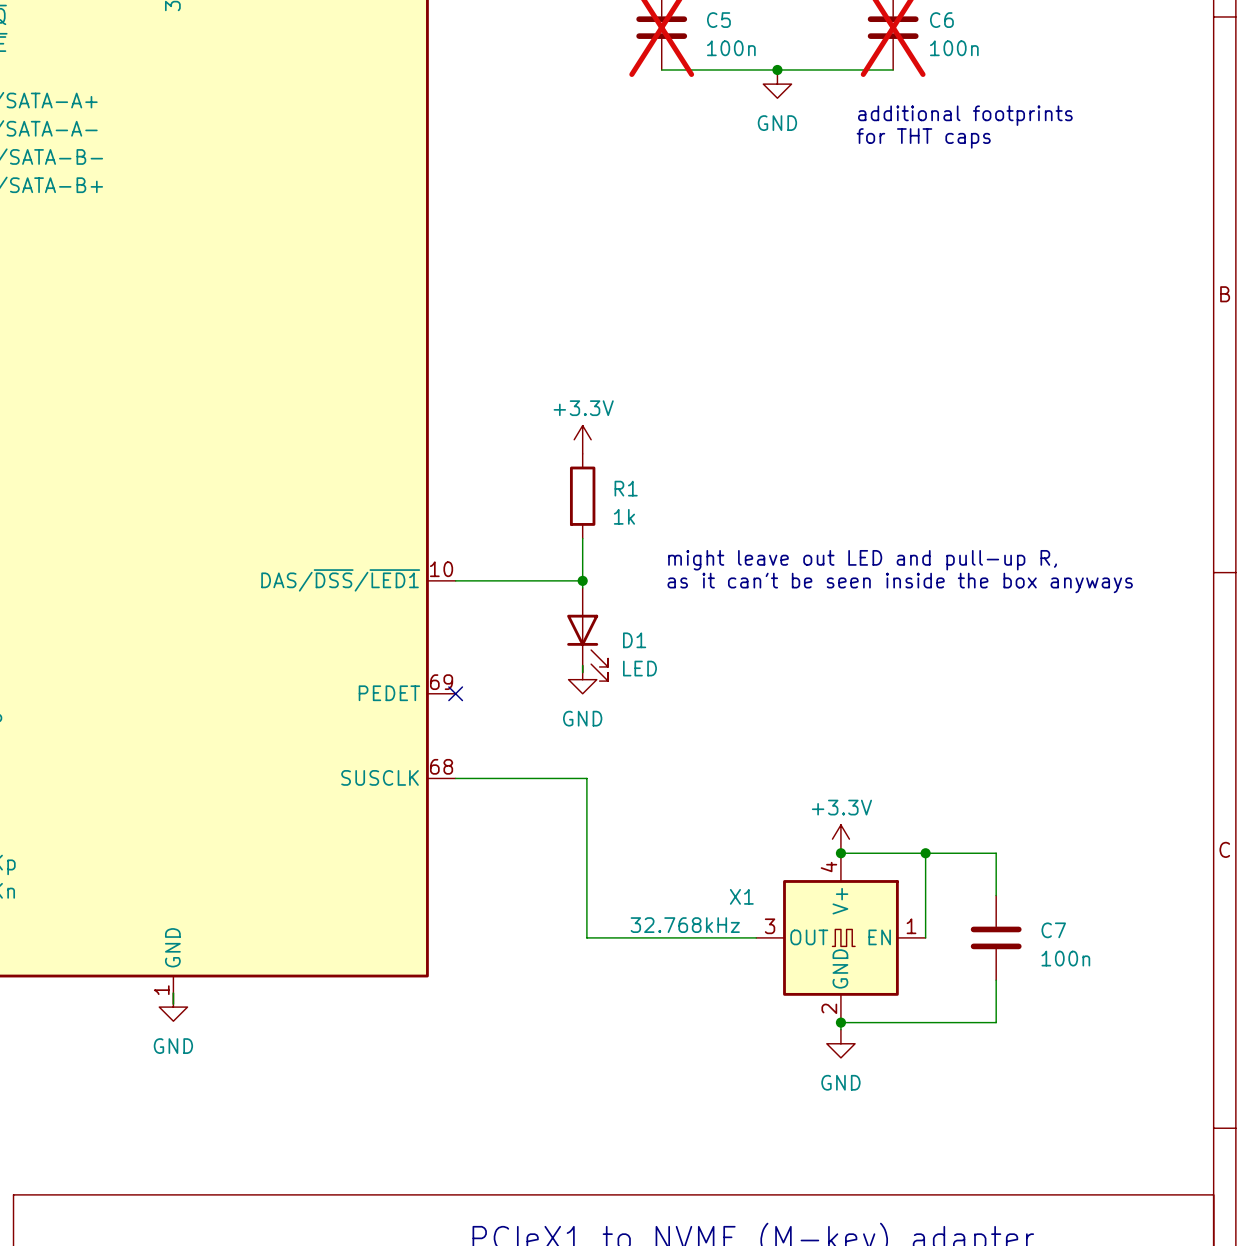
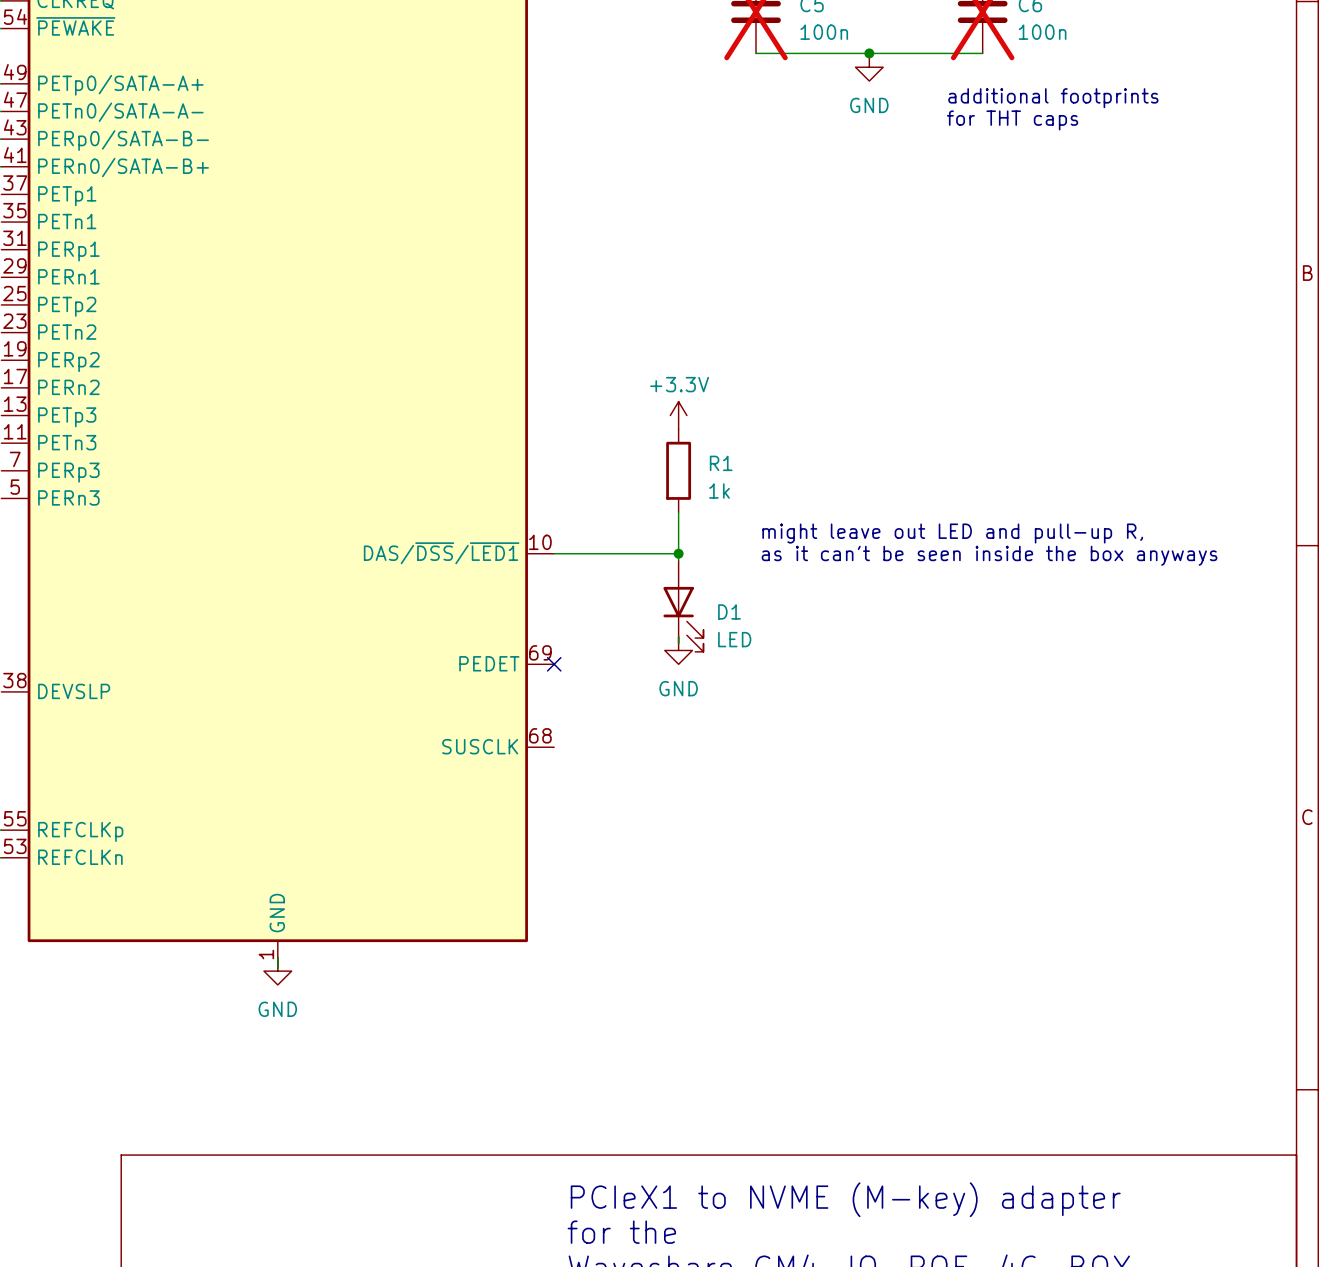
wire: (455, 778) (586, 778) (586, 937) (756, 937) -> none
power symbol: +3.3V (840, 839) -> none
wire: (840, 853) (996, 853) (996, 895) -> none
junction: (840, 853) -> none
wire: (925, 853) (925, 937) -> none
junction: (925, 853) -> none
X1: 32.768kHz (840, 937) -> none
C7: 100n (996, 937) -> none
wire: (996, 980) (996, 1022) (840, 1022) (840, 1029) -> none
junction: (840, 1022) -> none
power symbol: GND (840, 1043) -> none

